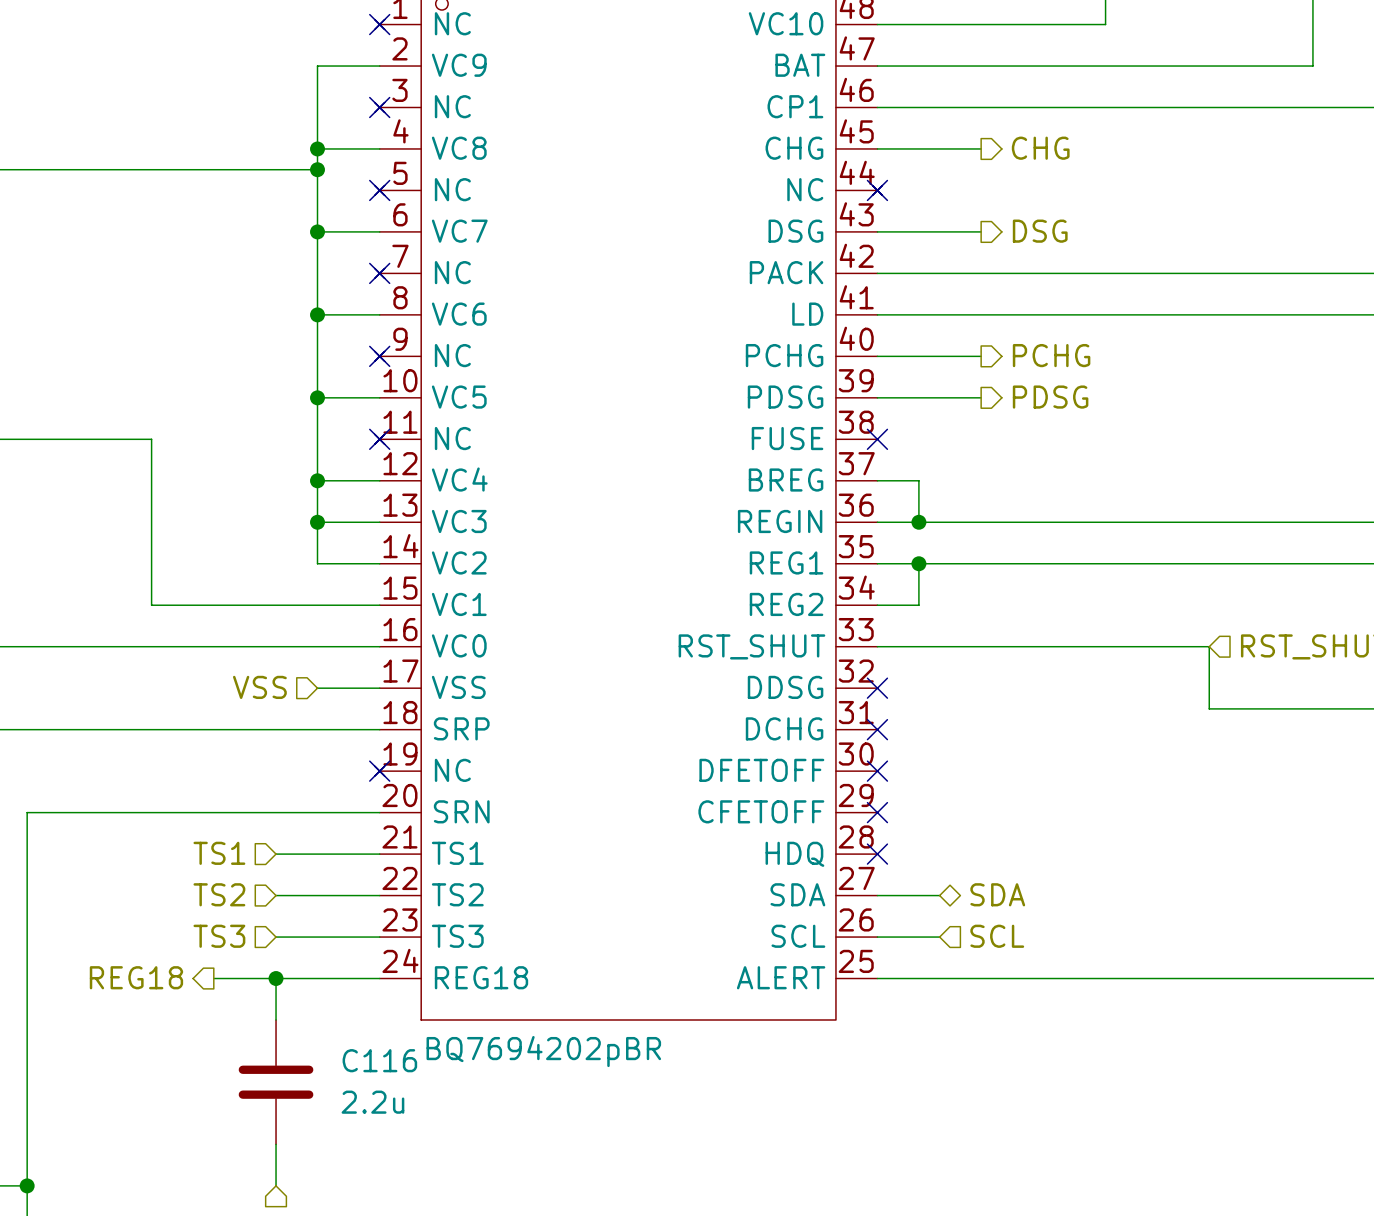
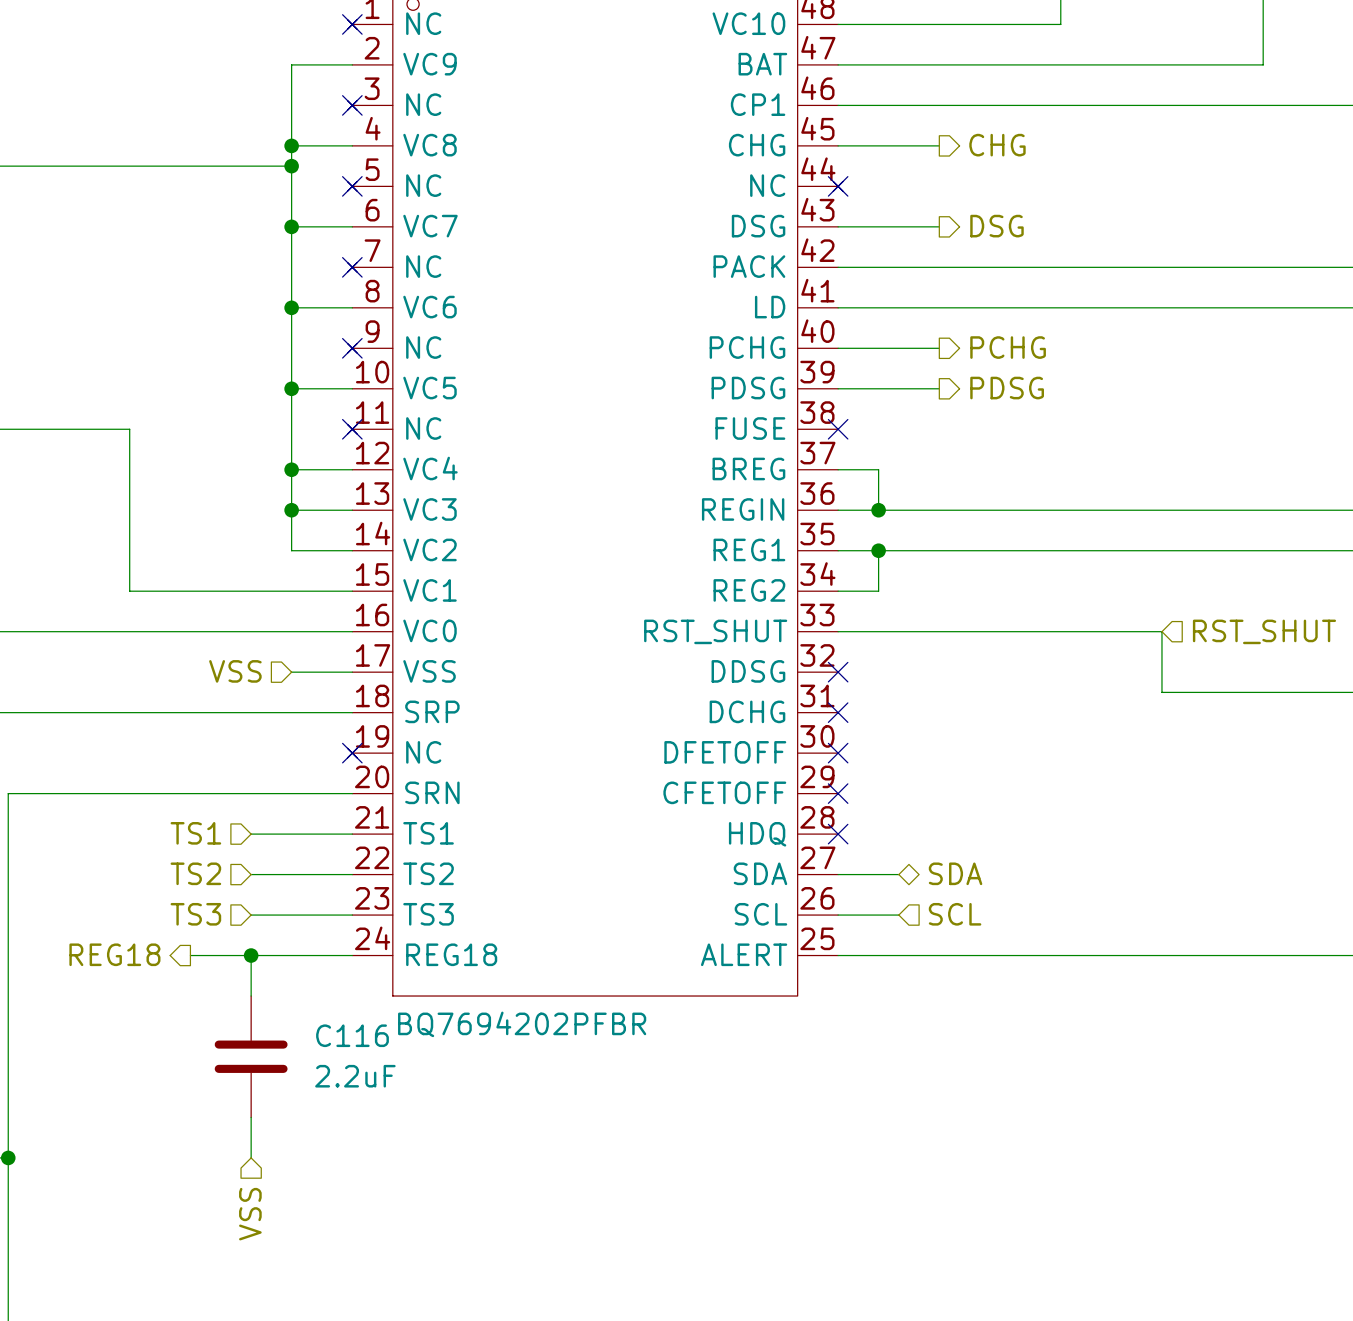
part value: BQ7694202pBR (543, 1051) -> BQ7694202PFBR (522, 1024)
C116 value: 2.2u (372, 1102) -> 2.2uF (355, 1076)

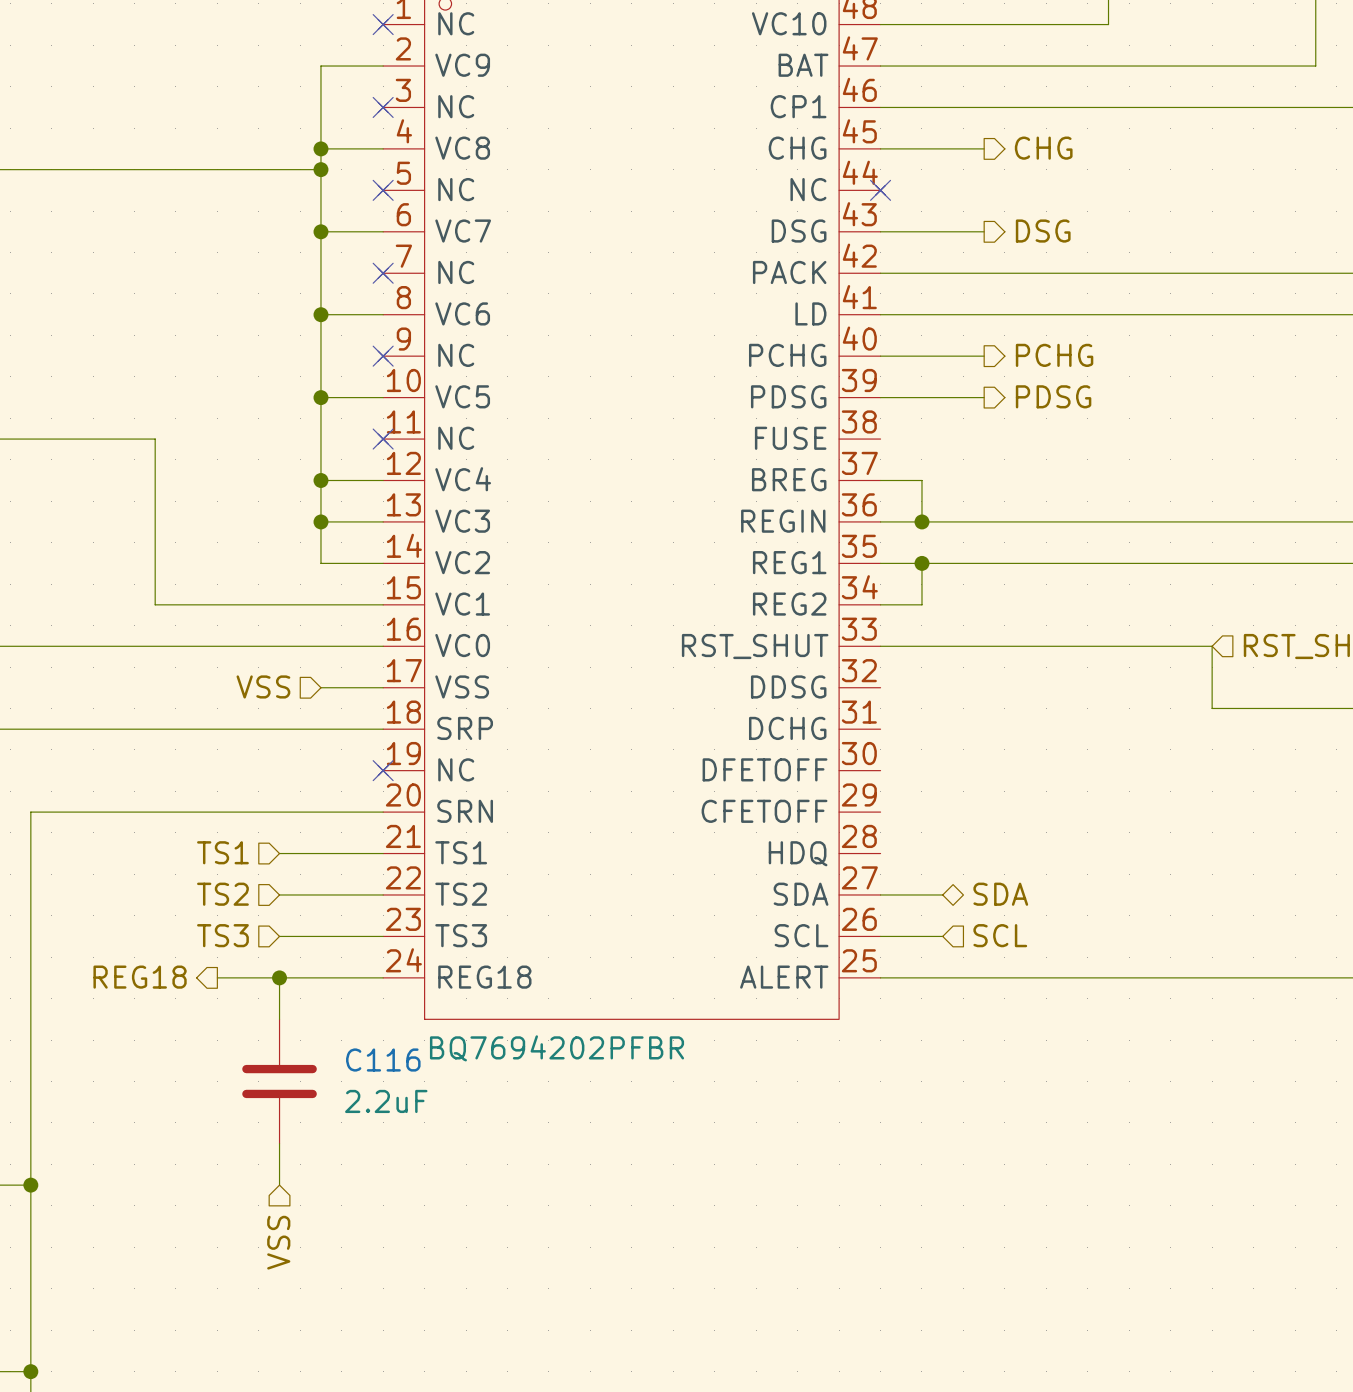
no-connect mark: (838, 429) -> none
no-connect mark: (838, 672) -> none
no-connect mark: (838, 712) -> none
no-connect mark: (838, 753) -> none
no-connect mark: (838, 793) -> none
no-connect mark: (838, 834) -> none

